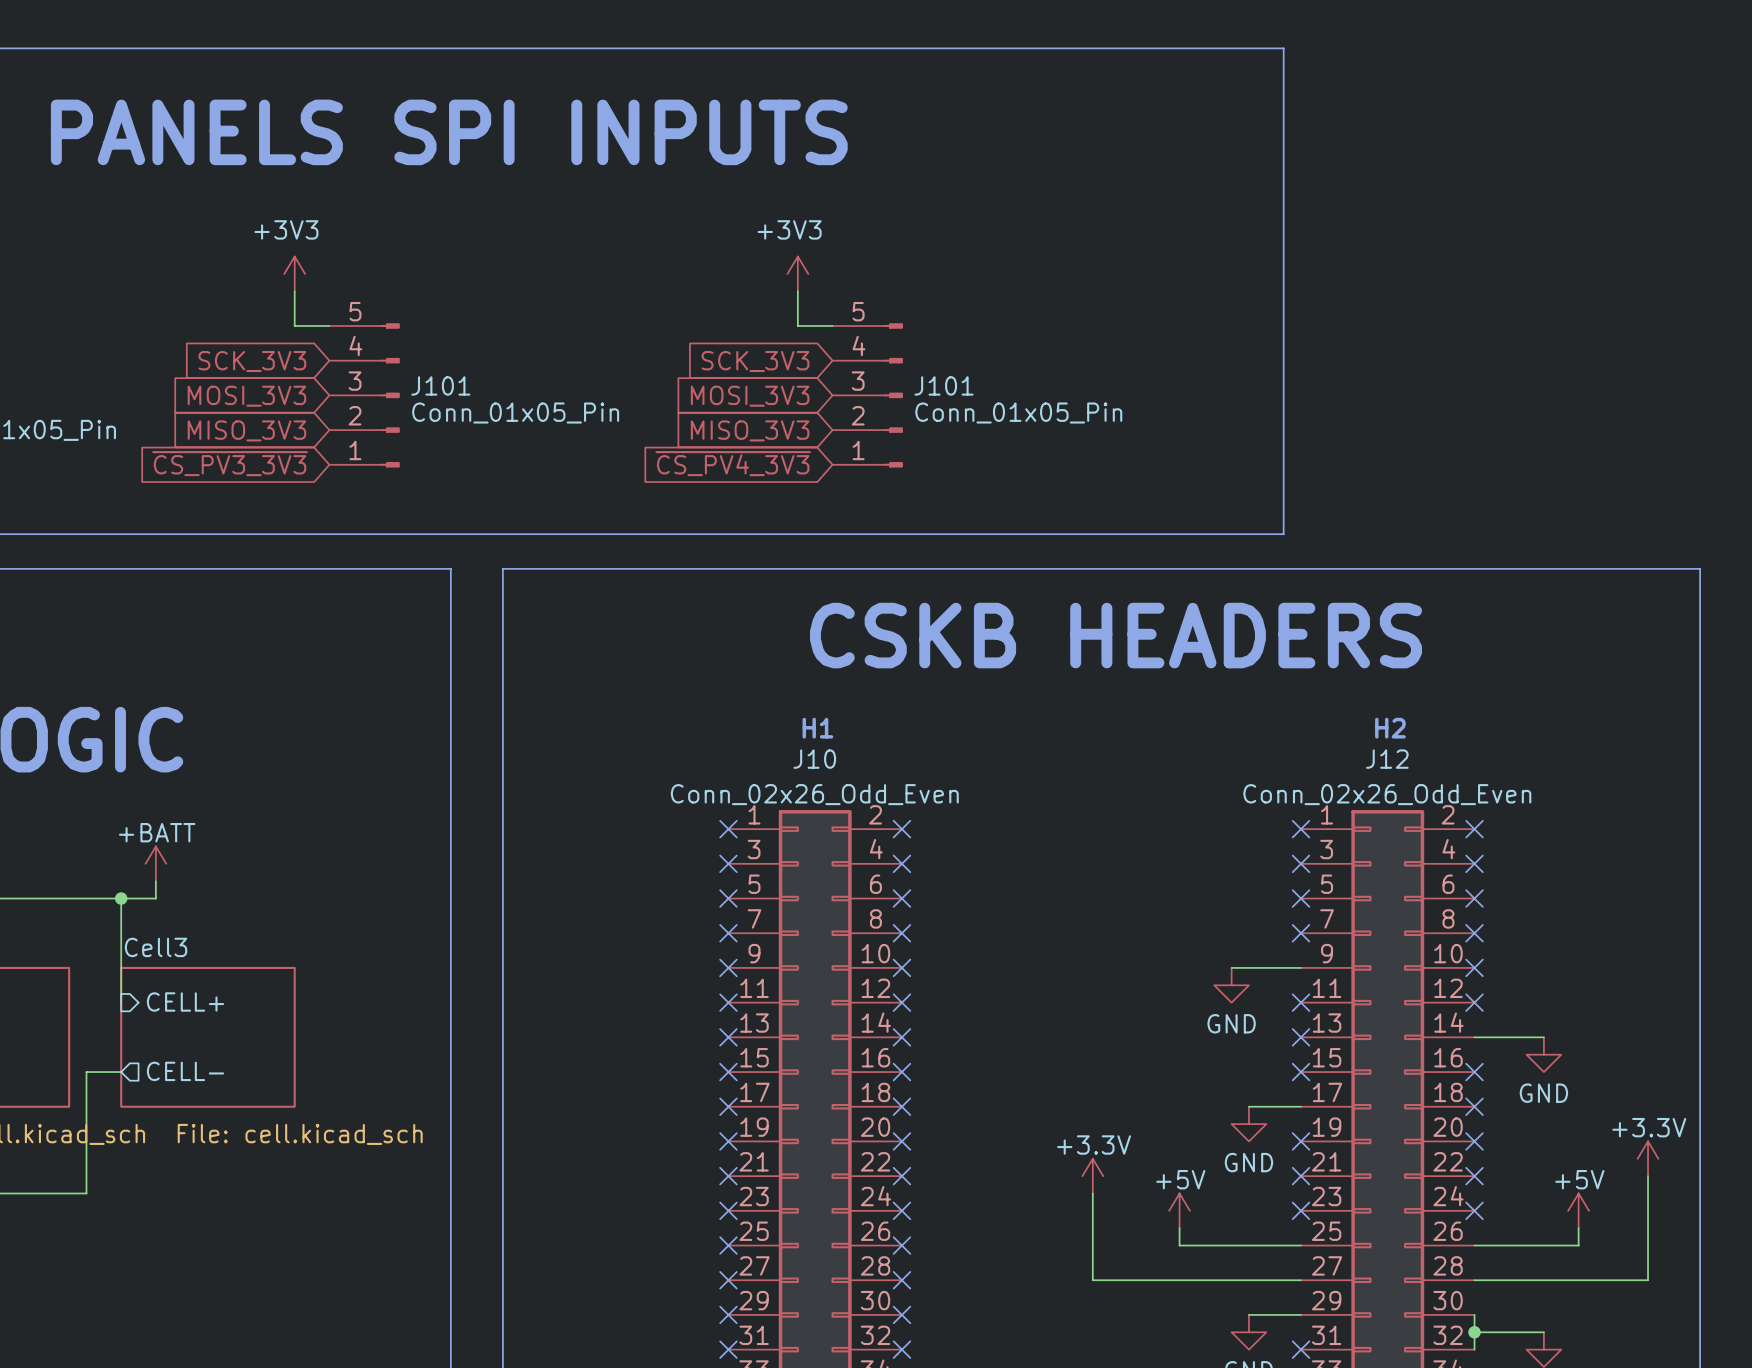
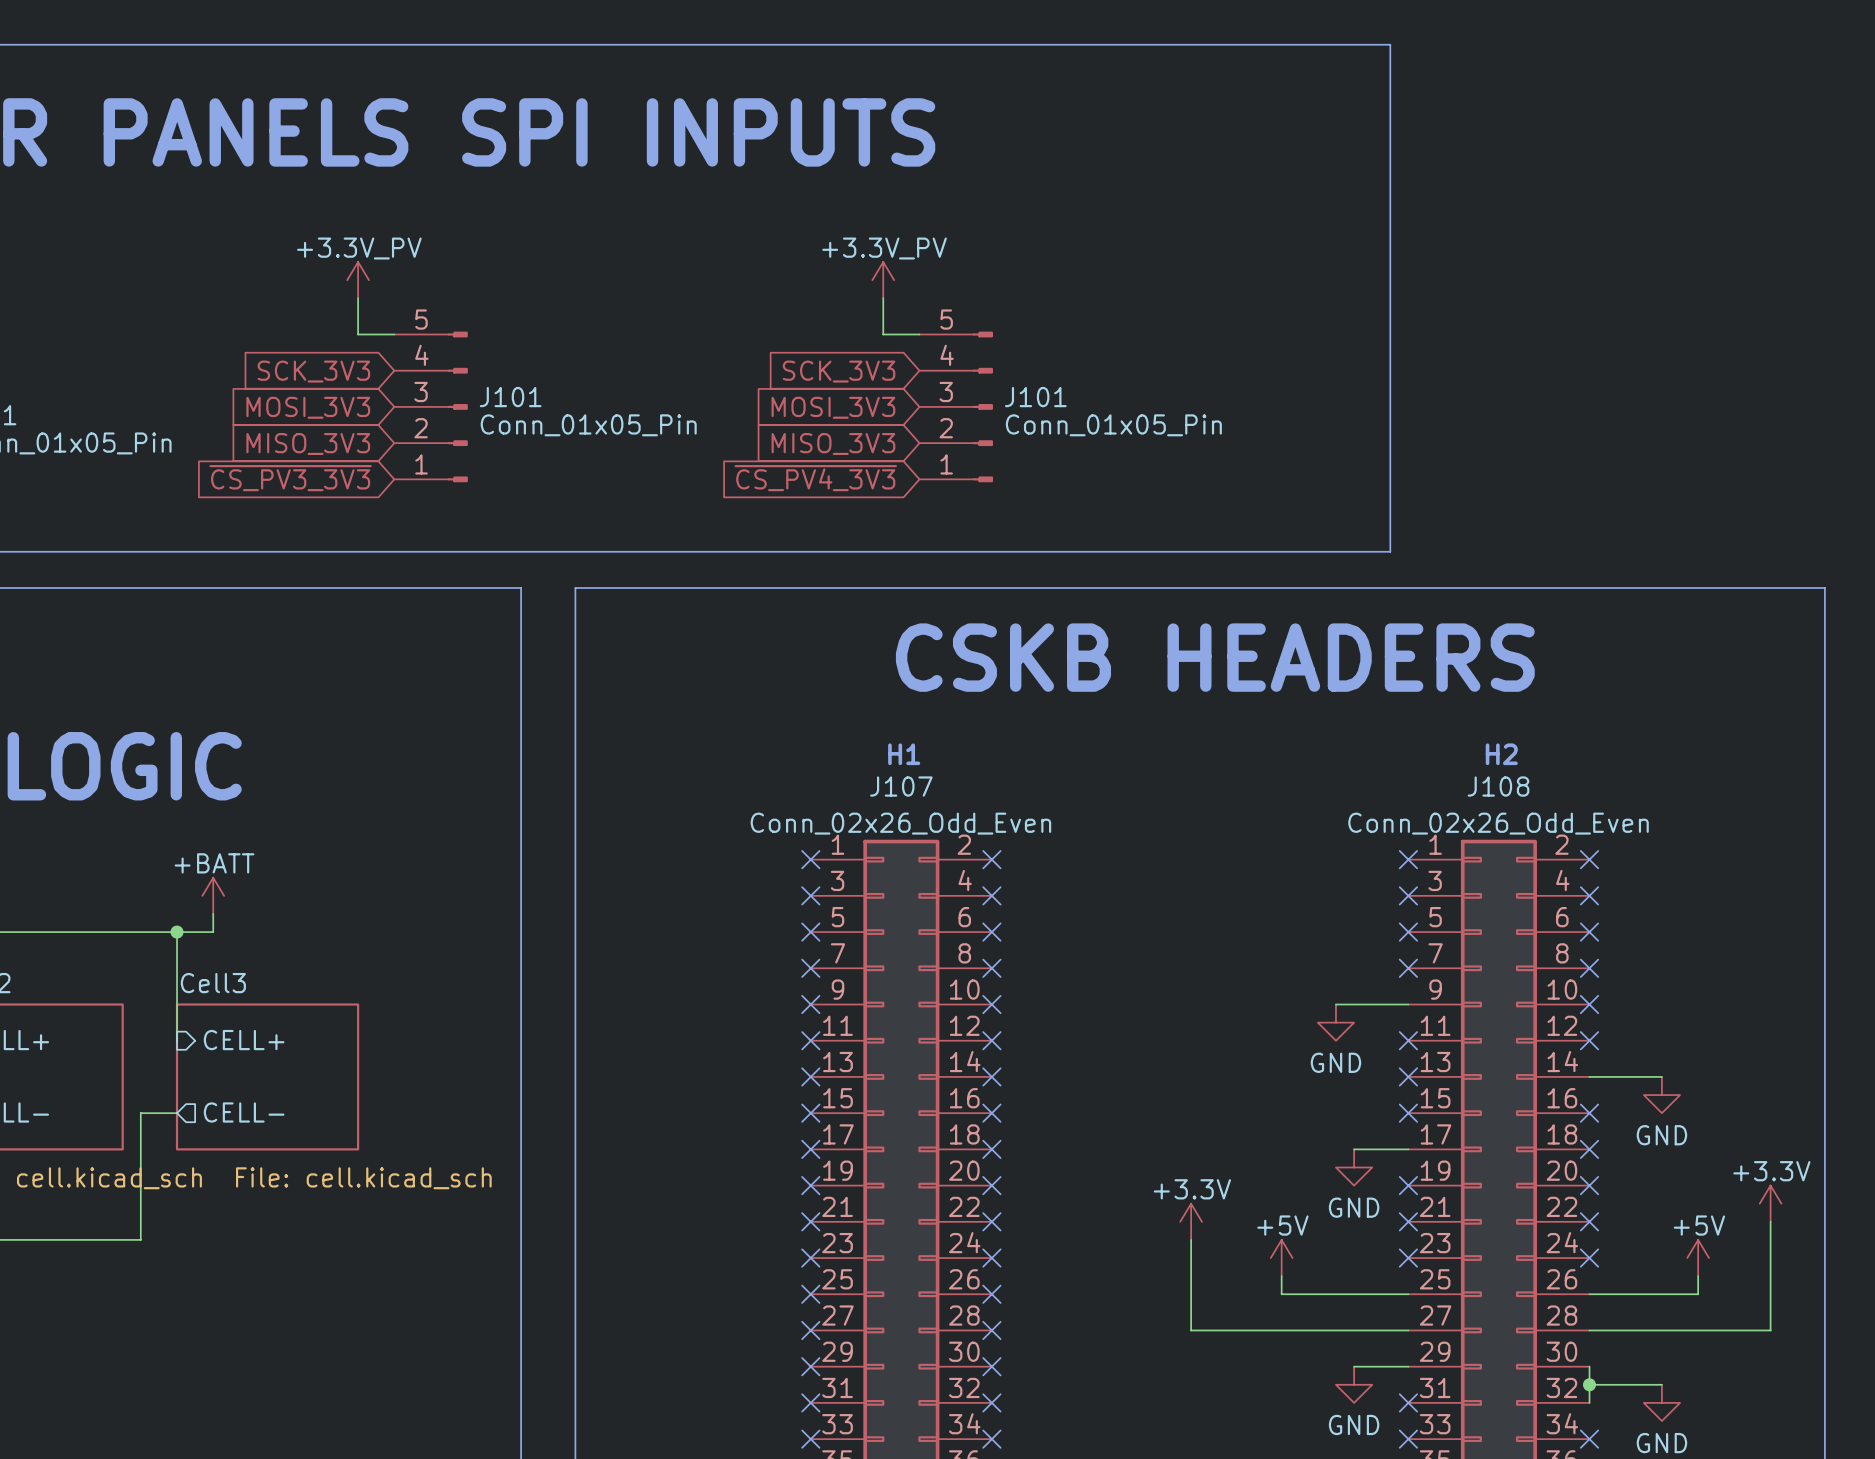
power symbol: +3V3 (294, 273) -> +3.3V_PV (358, 280)
power symbol: +3V3 (797, 273) -> +3.3V_PV (883, 280)
J10 name: J10 (814, 759) -> J107 (901, 786)
J12 name: J12 (1387, 759) -> J108 (1498, 786)

